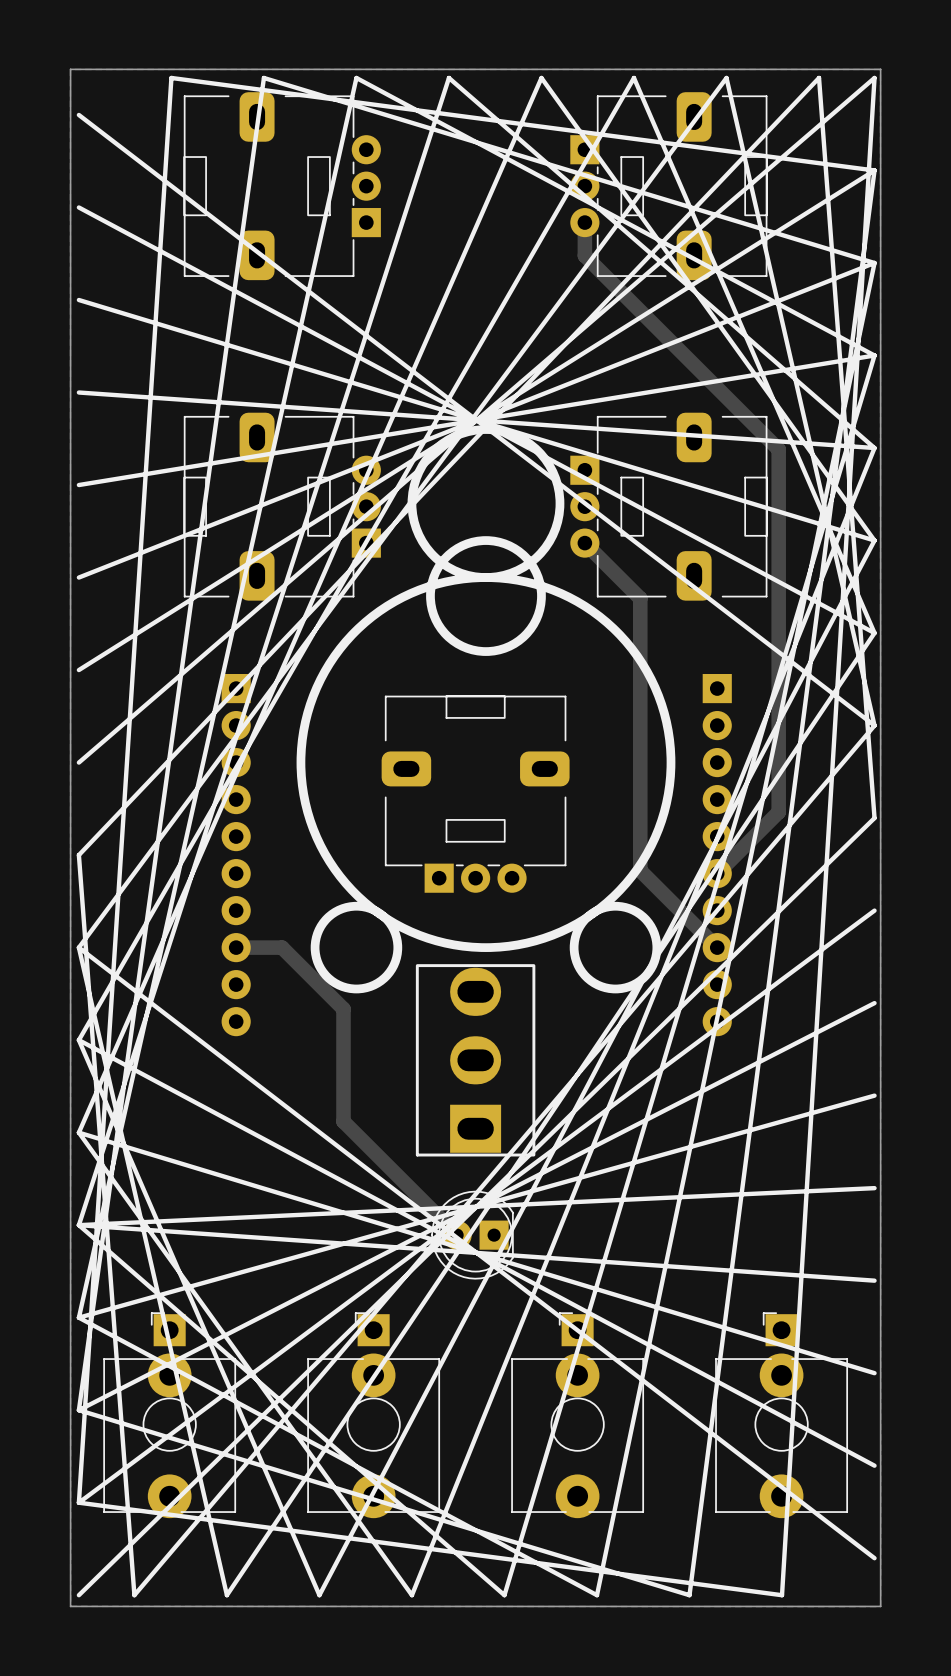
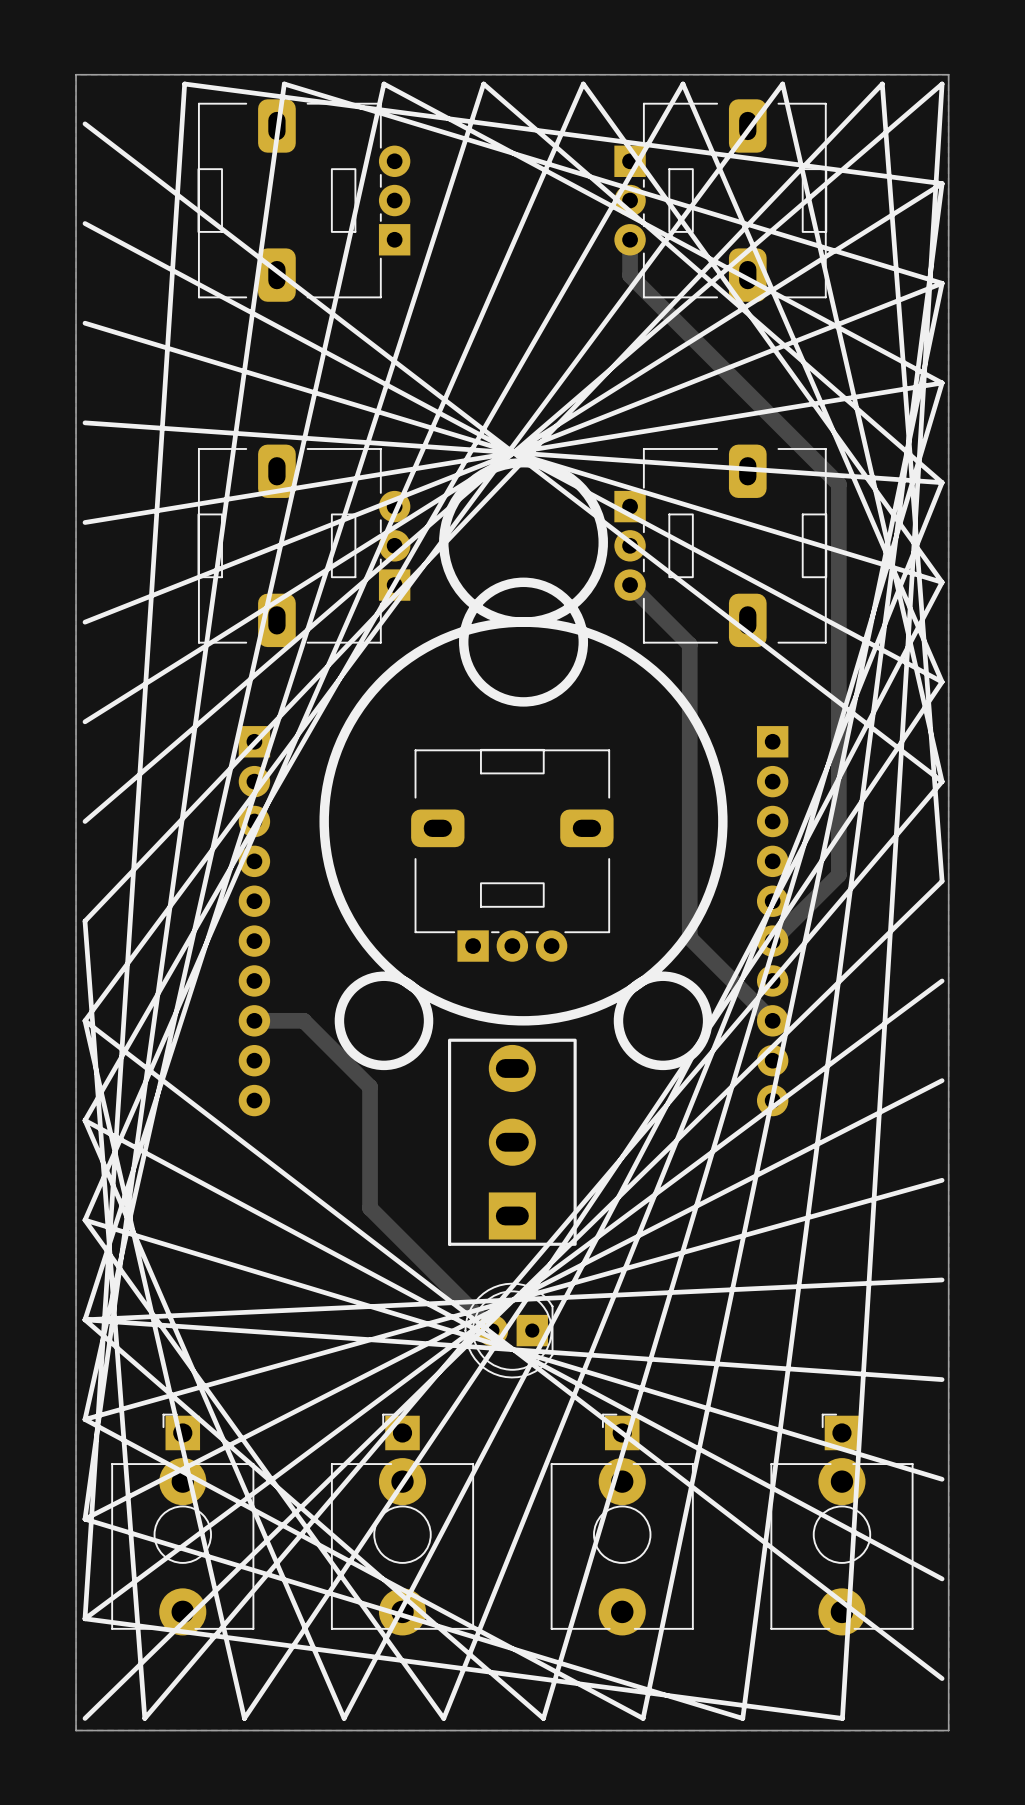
part footprint: [415, 964, 536, 1157] -> [448, 1038, 577, 1246]

